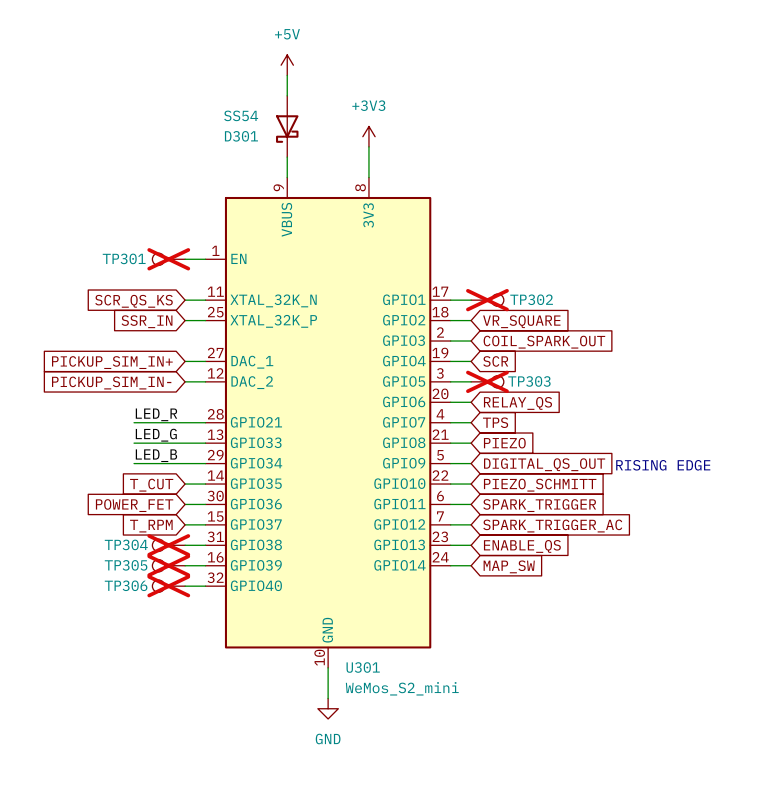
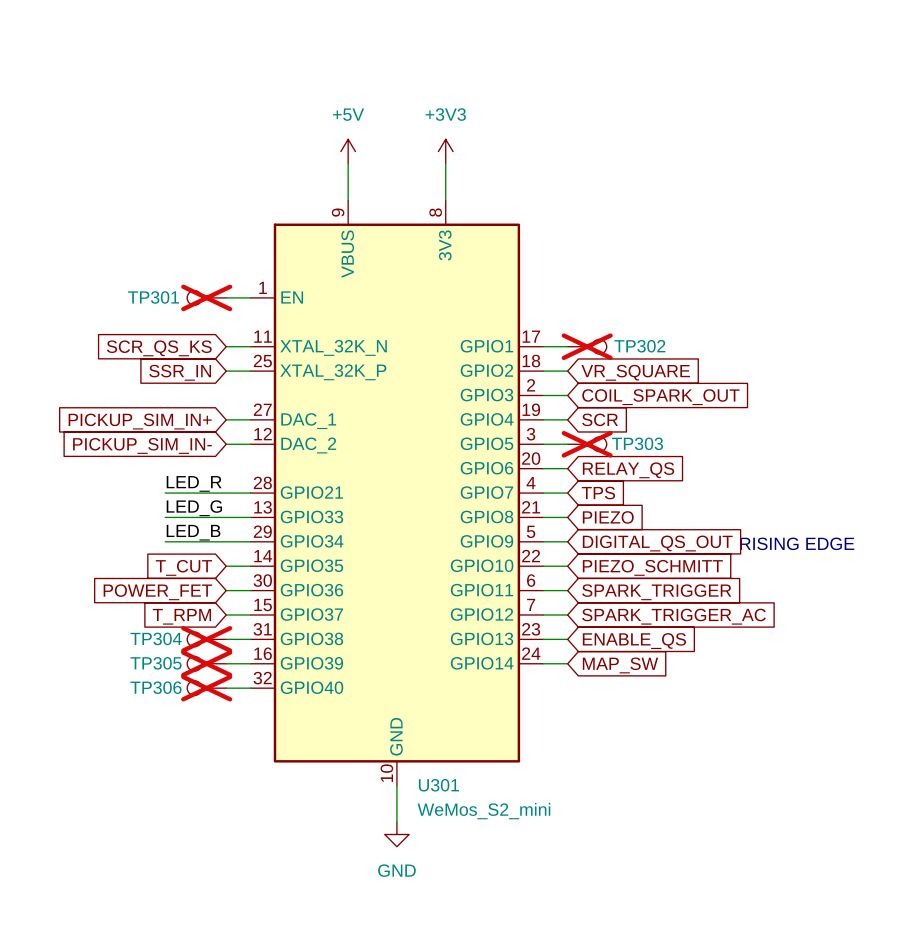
power symbol position: +5V (287, 65) -> +5V (348, 151)
wire: (287, 75) (287, 95) -> none
D301: SS54 (287, 126) -> none

